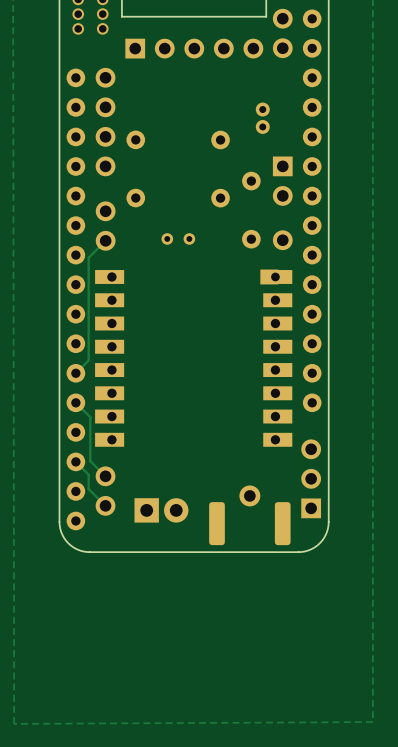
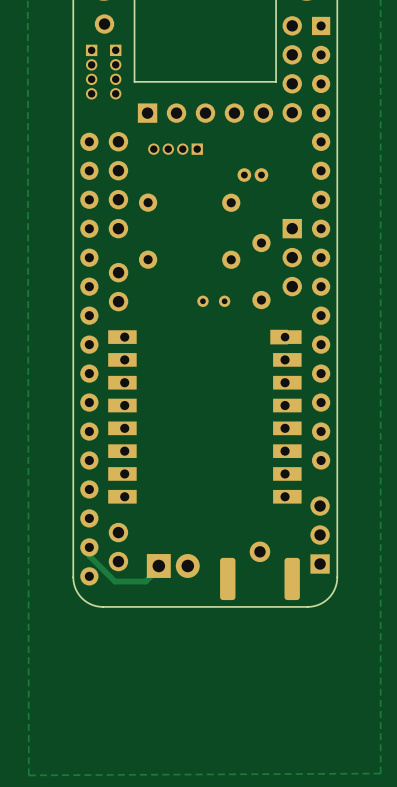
part: none -> (175, 149)
part rotation: 0° (262, 118) -> 90° clockwise (252, 175)
part position: (262, 118) -> (252, 175)
part footprint: [272, 156, 293, 251] -> [282, 218, 302, 297]
part position: (178, 238) -> (213, 301)
track: (105, 240) (88, 257) (88, 360) (75, 373) -> none
track: (75, 402) (90, 417) (90, 461) (105, 476) -> none
track: (75, 461) (88, 474) (88, 488) (105, 505) -> none
track: none -> (89, 547) (89, 556) (114, 581) (145, 581) (158, 568)

